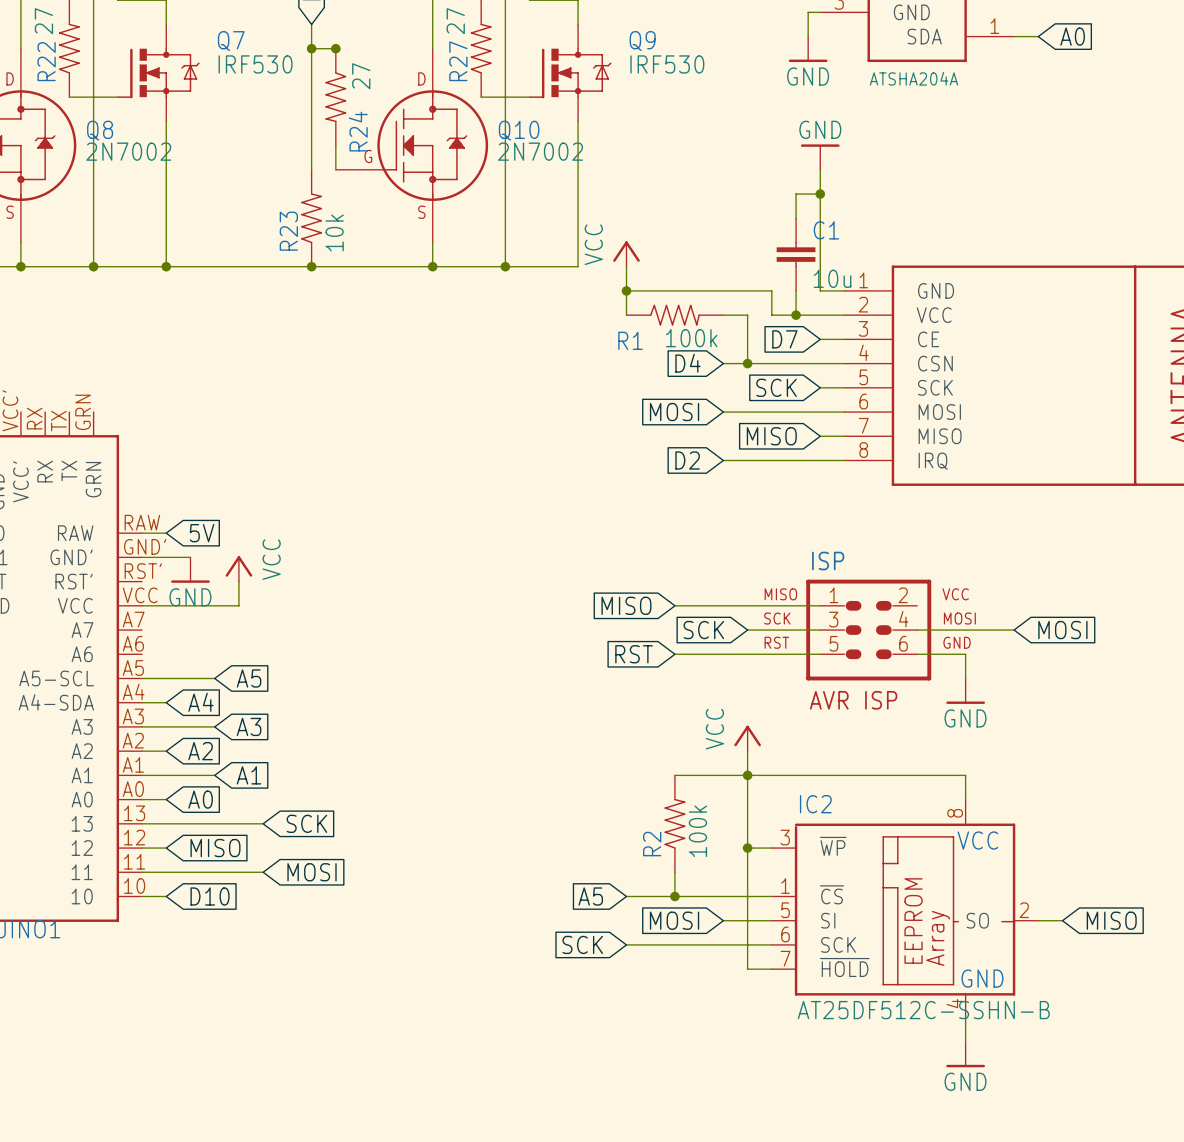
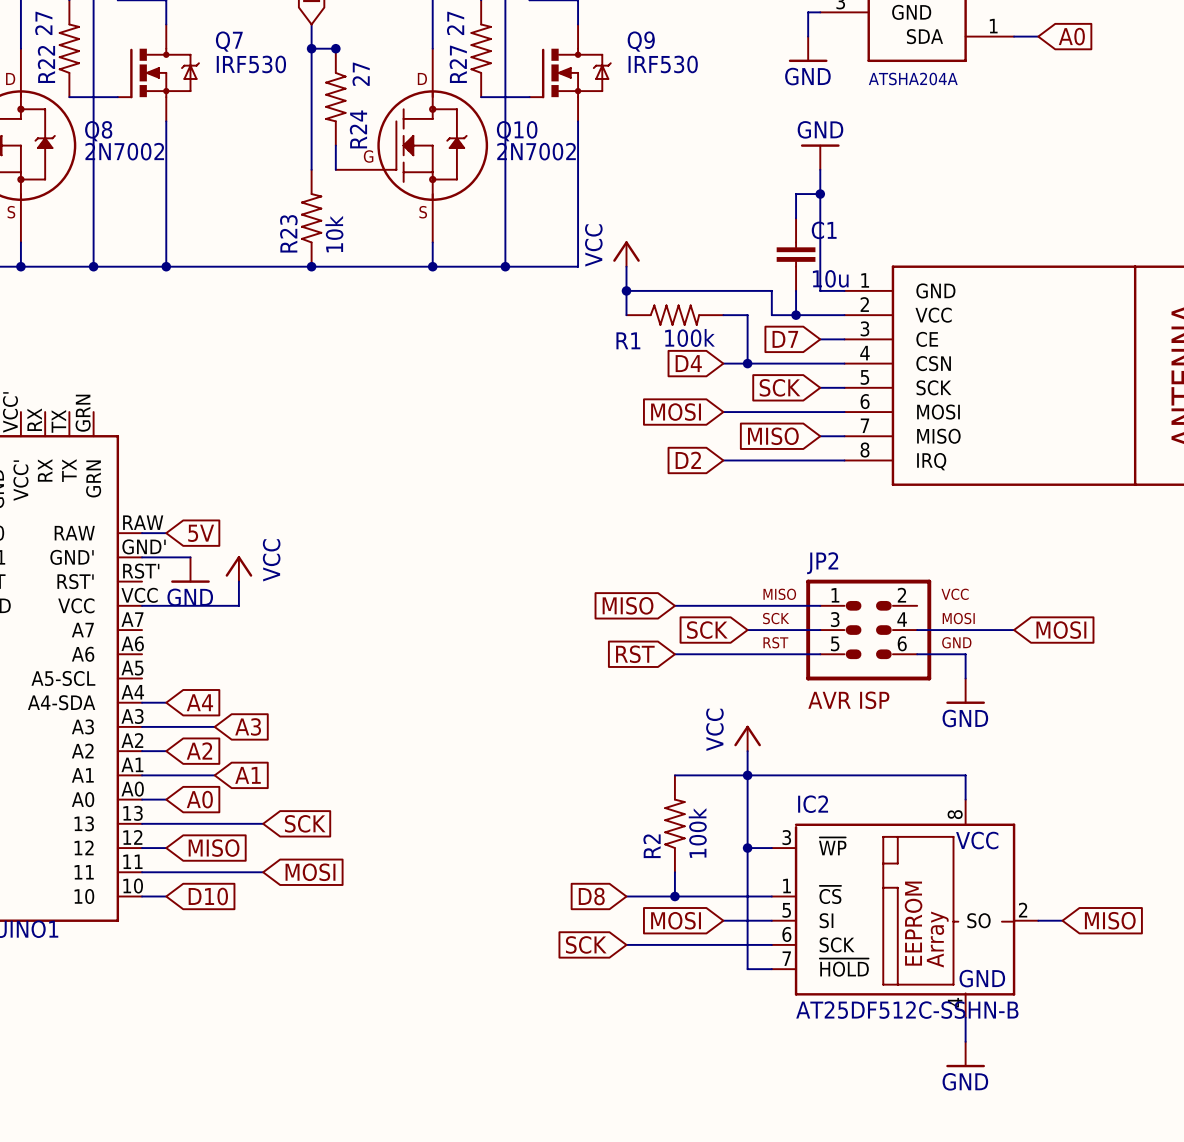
ISP name: ISP (828, 561) -> JP2 (822, 563)
wire: (142, 678) (214, 678) -> none
global label: A5 (249, 678) -> none
global label: A5 (590, 896) -> D8 (591, 896)

